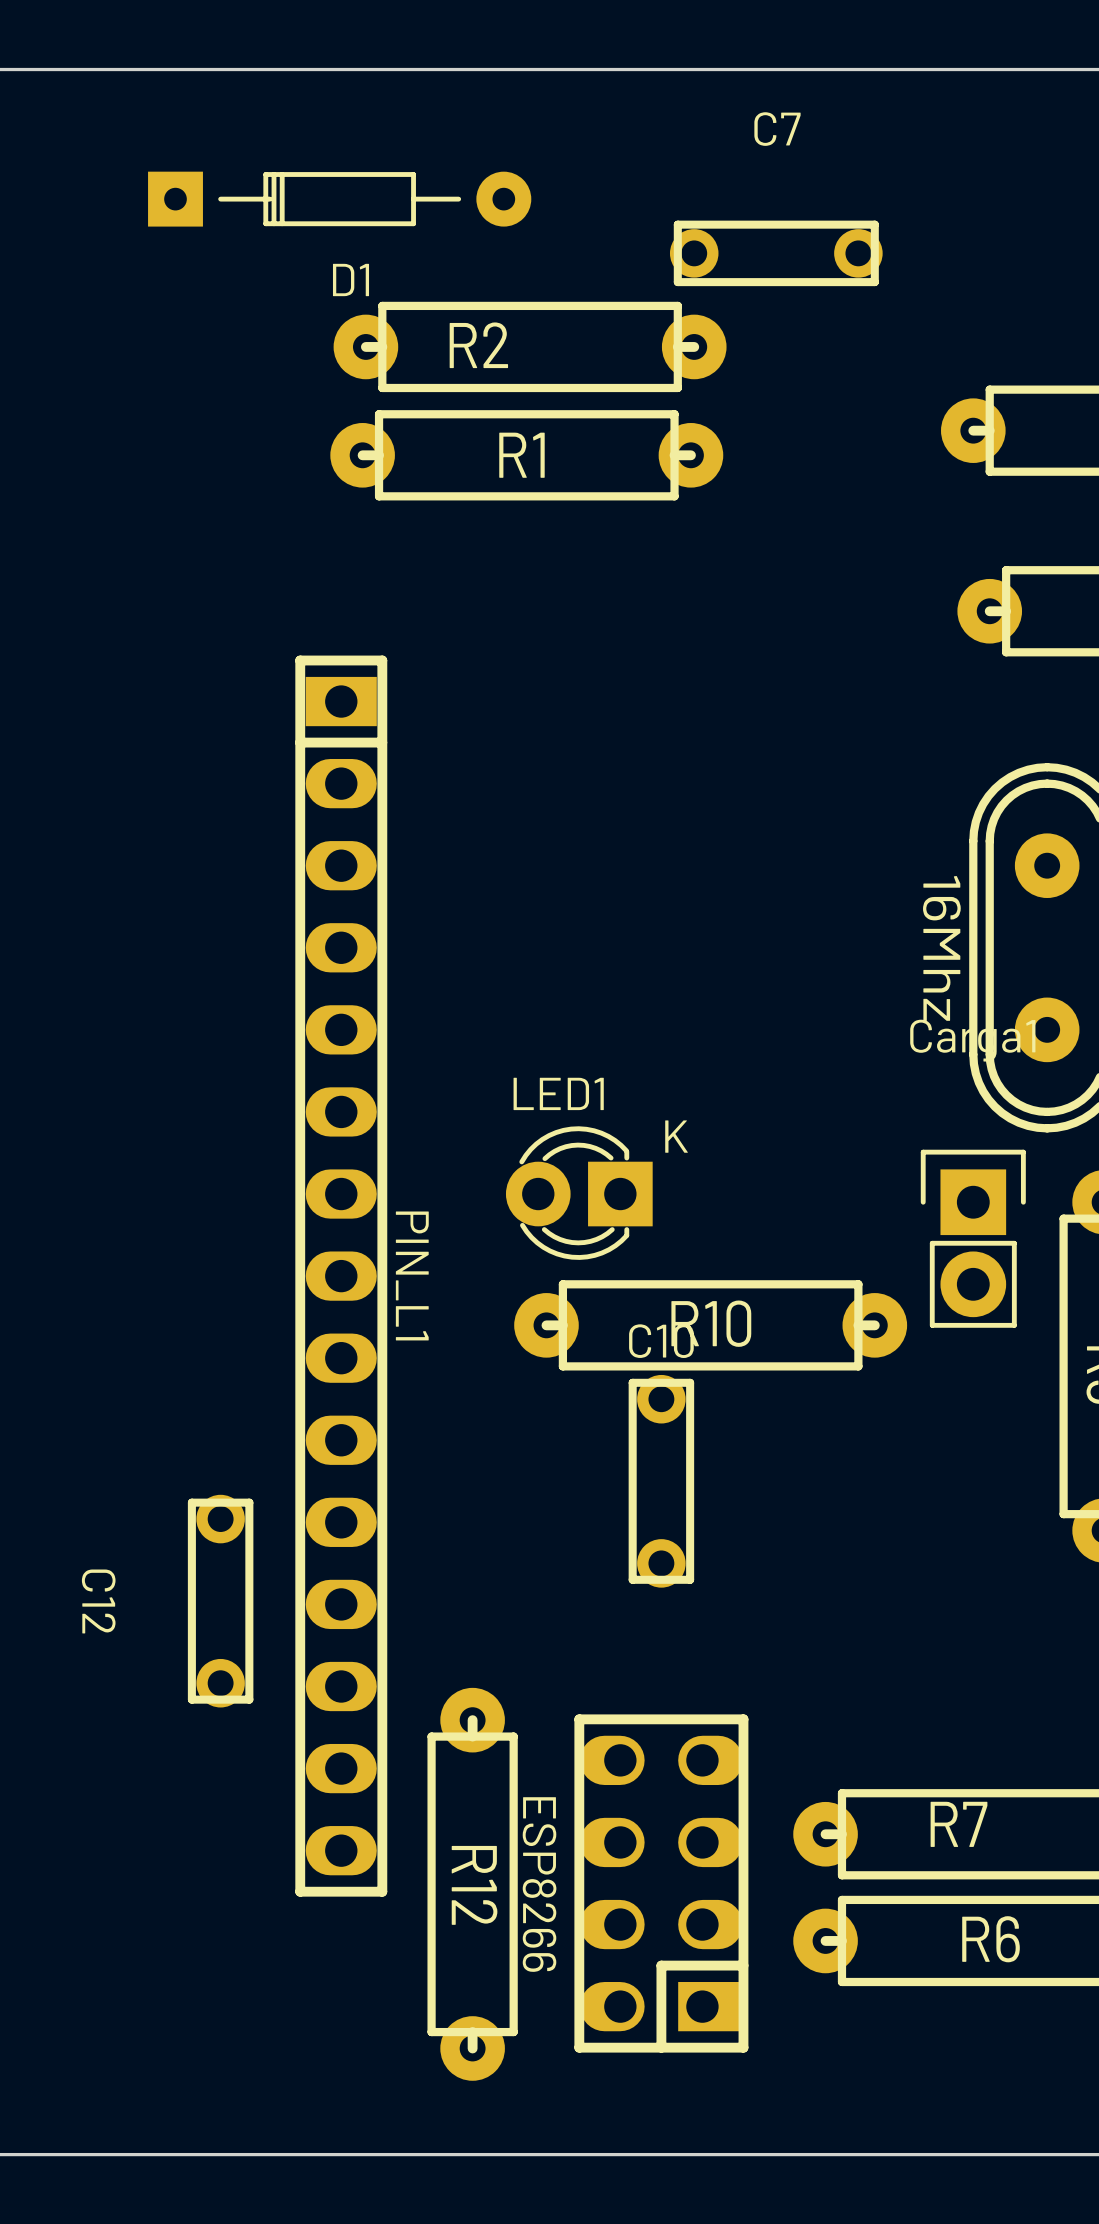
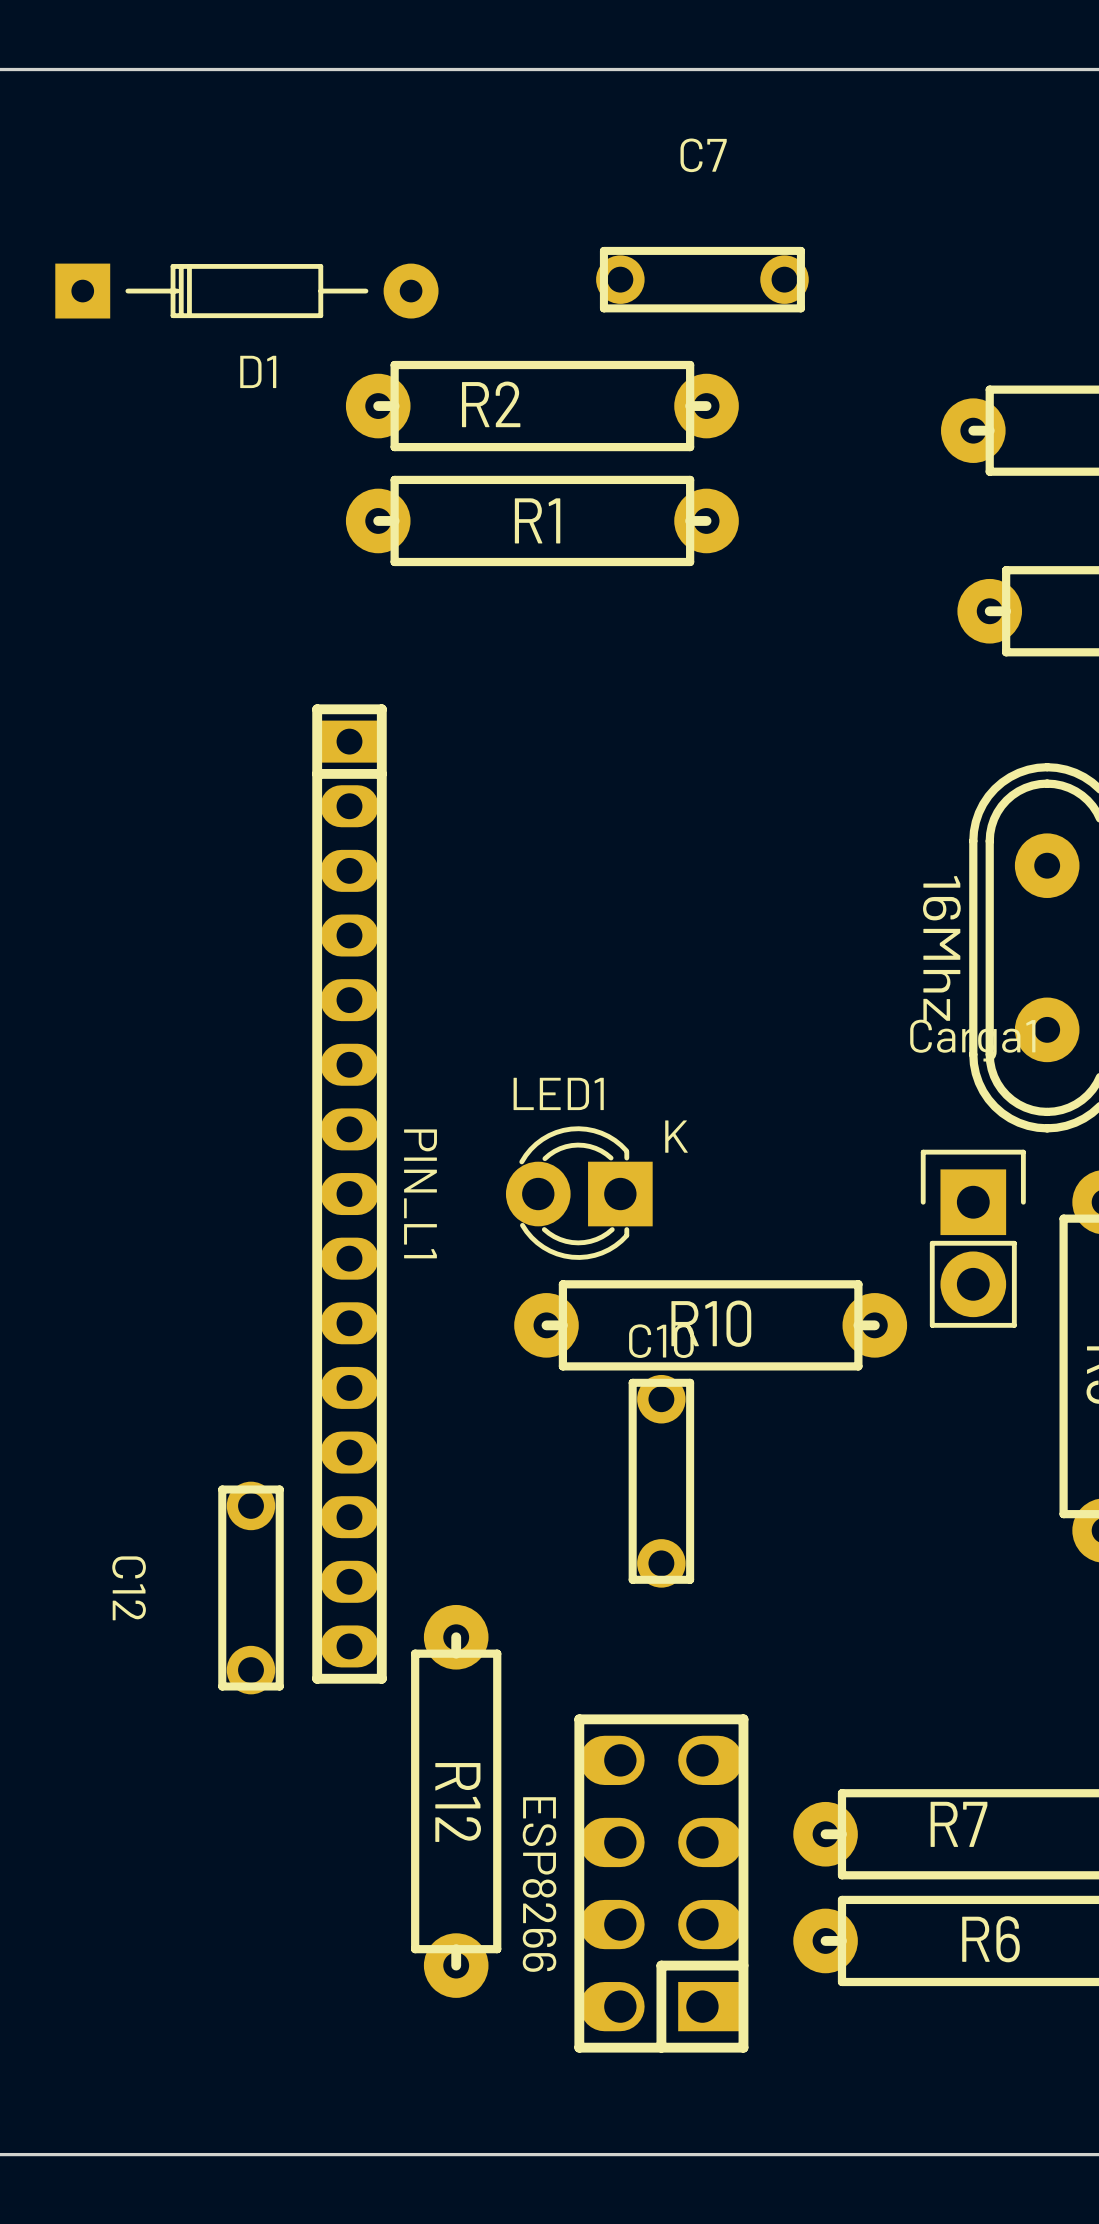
D1 position: (339, 199) -> (246, 291)
C7 position: (776, 253) -> (702, 279)
R2 position: (530, 346) -> (542, 406)
R1 position: (526, 455) -> (542, 520)
PIN_L1 footprint: [295, 655, 388, 1897] -> [312, 704, 387, 1684]
C12 position: (220, 1601) -> (250, 1588)
R12 position: (472, 1884) -> (456, 1801)

